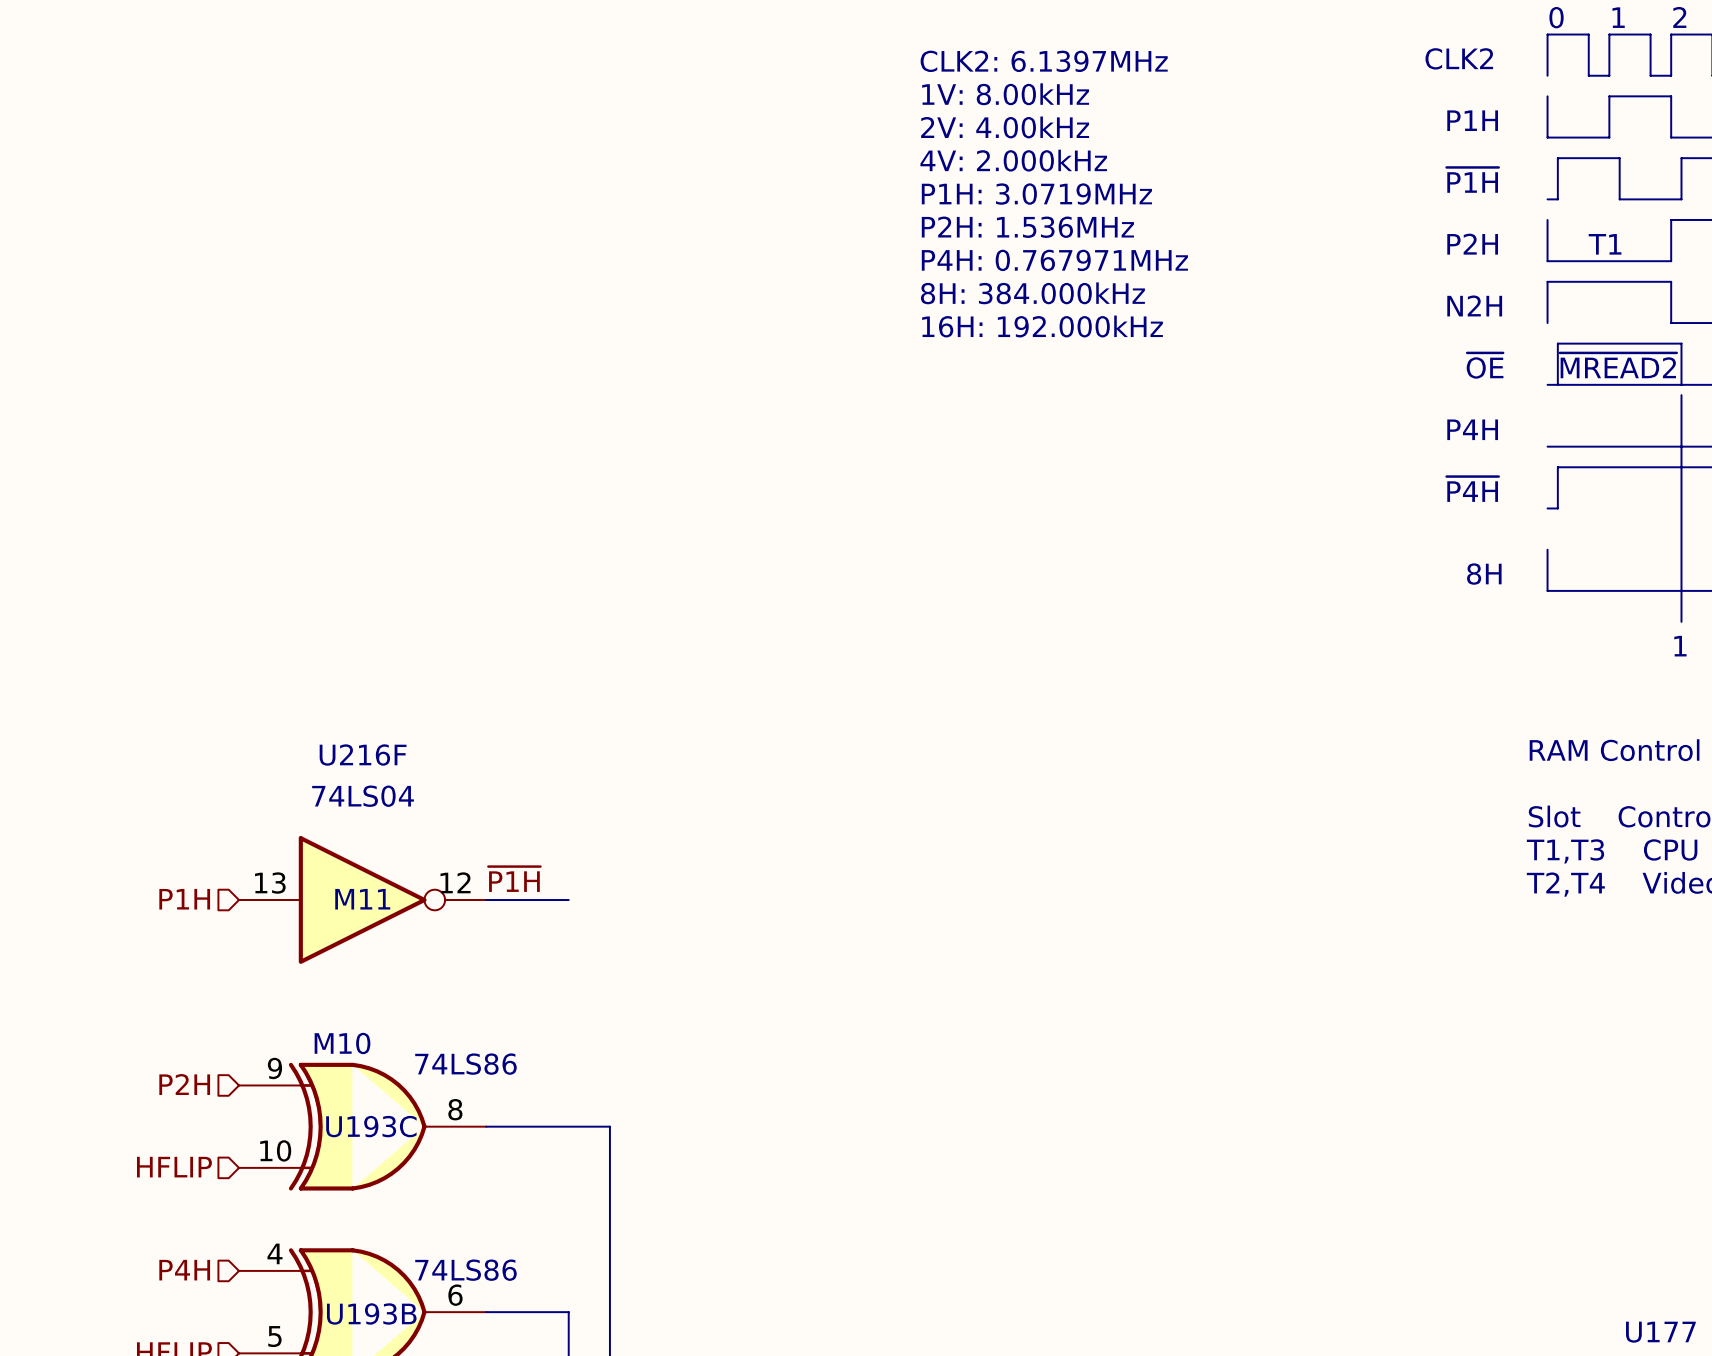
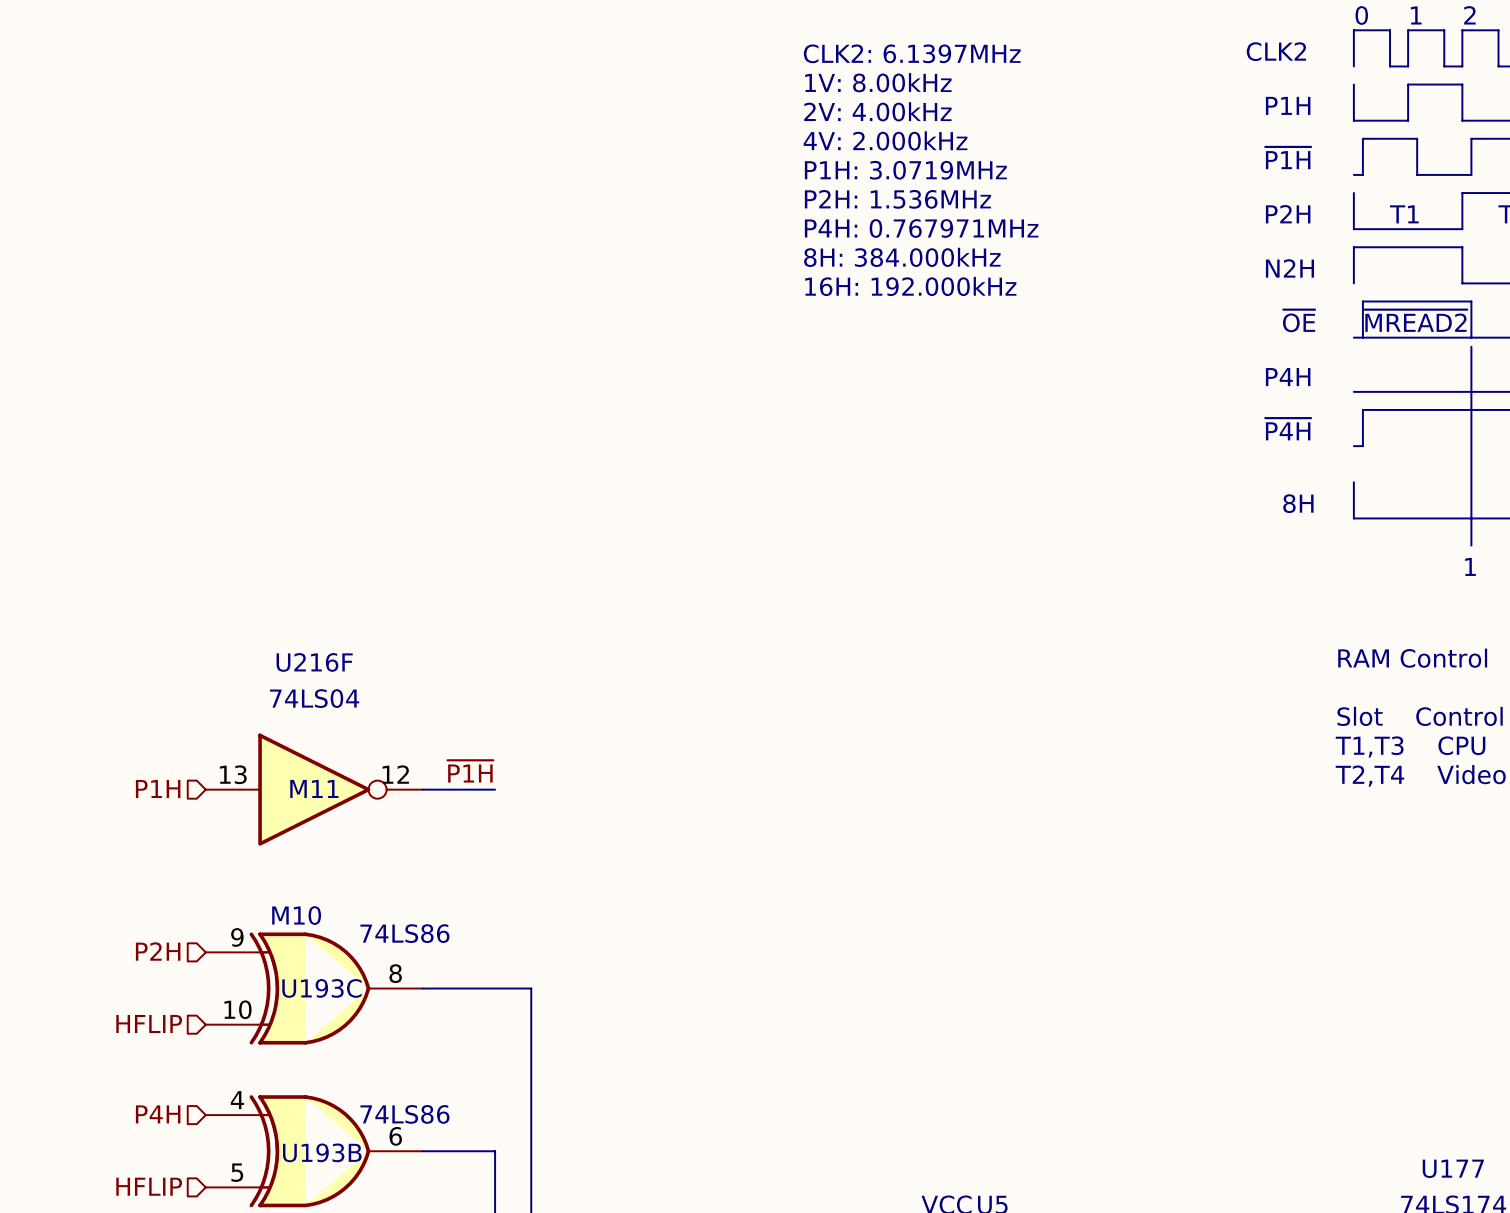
label position: ~{P1H} (514, 879) -> ~{P1H} (470, 771)

